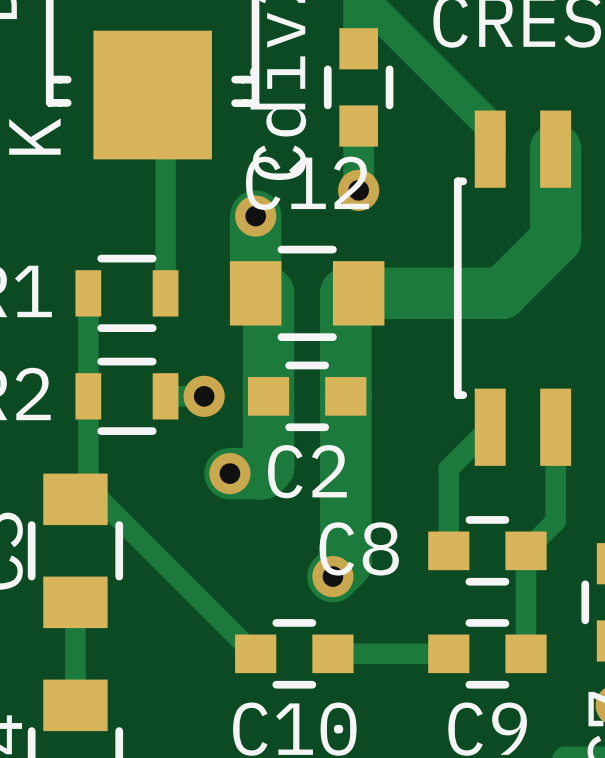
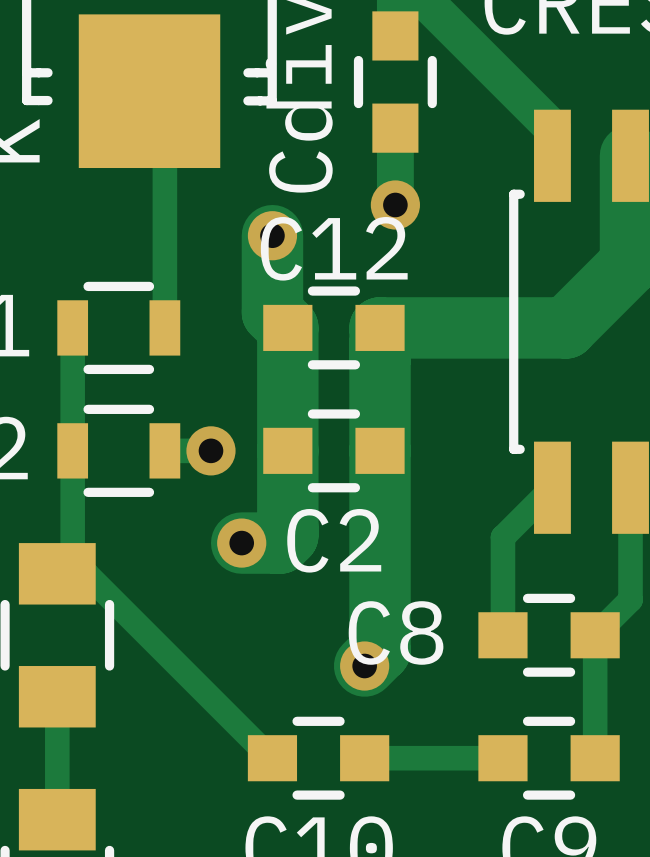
C12 name position: C12 (307, 183) -> C12 (334, 248)
C12 footprint: [229, 245, 385, 341] -> [263, 286, 405, 370]

